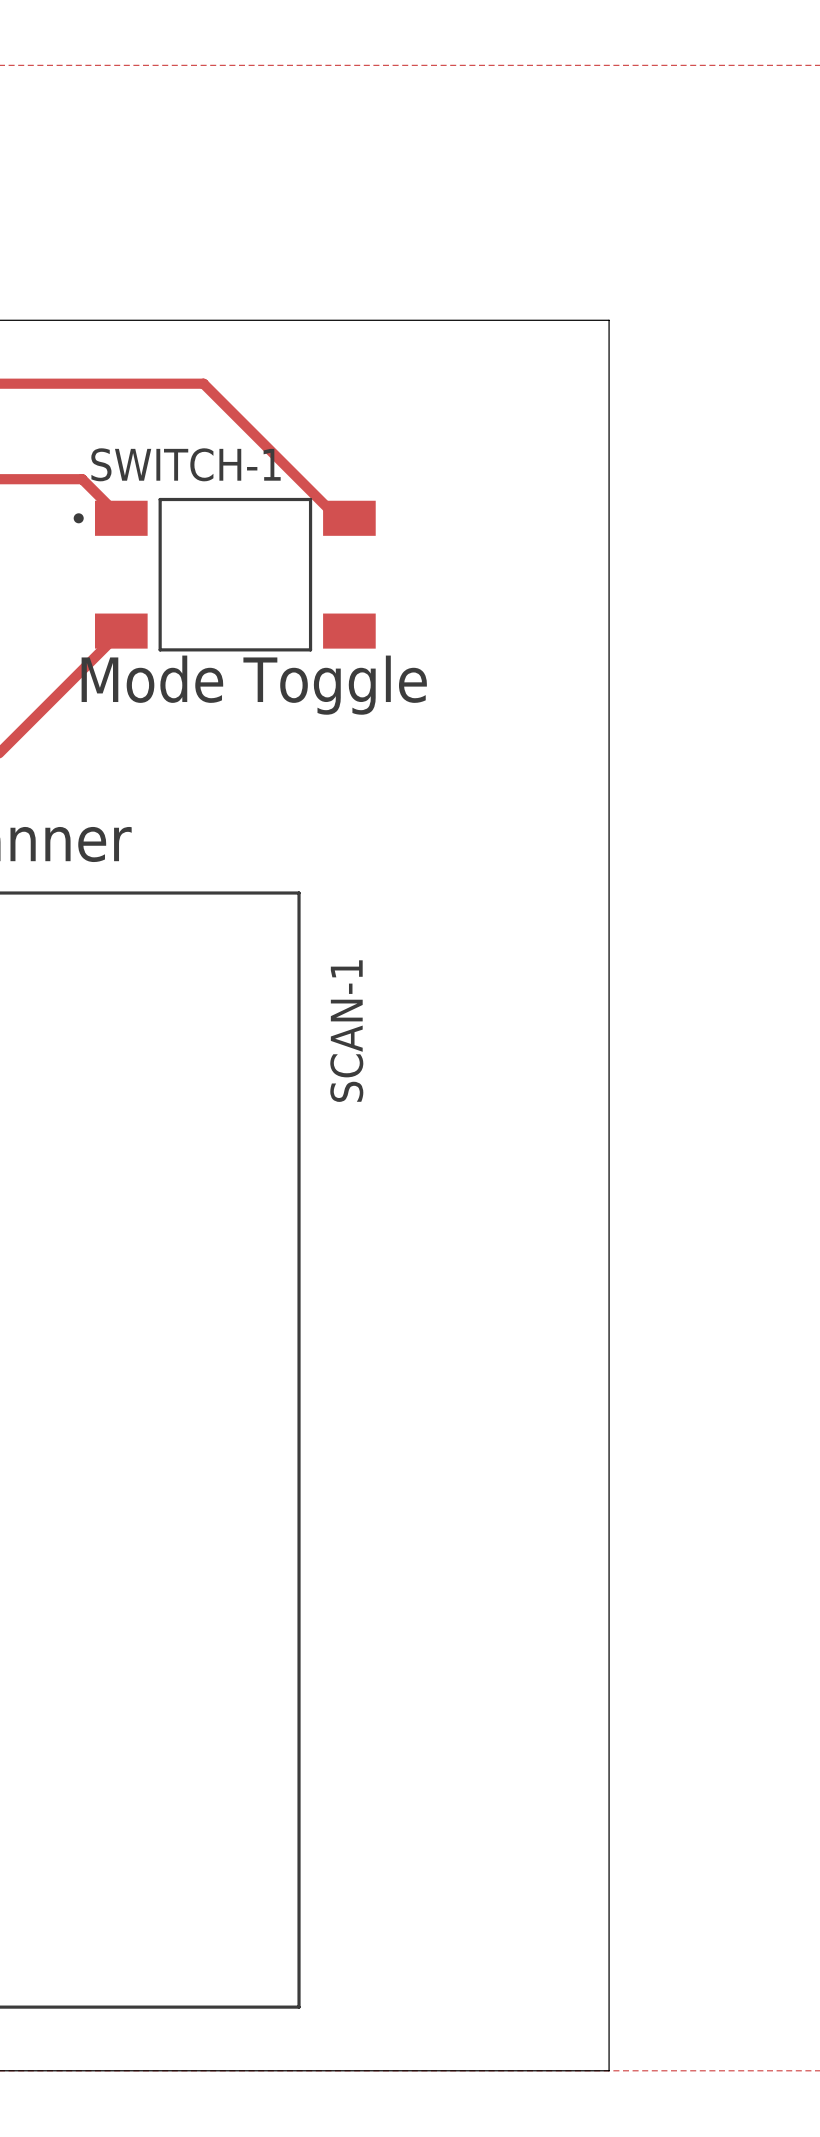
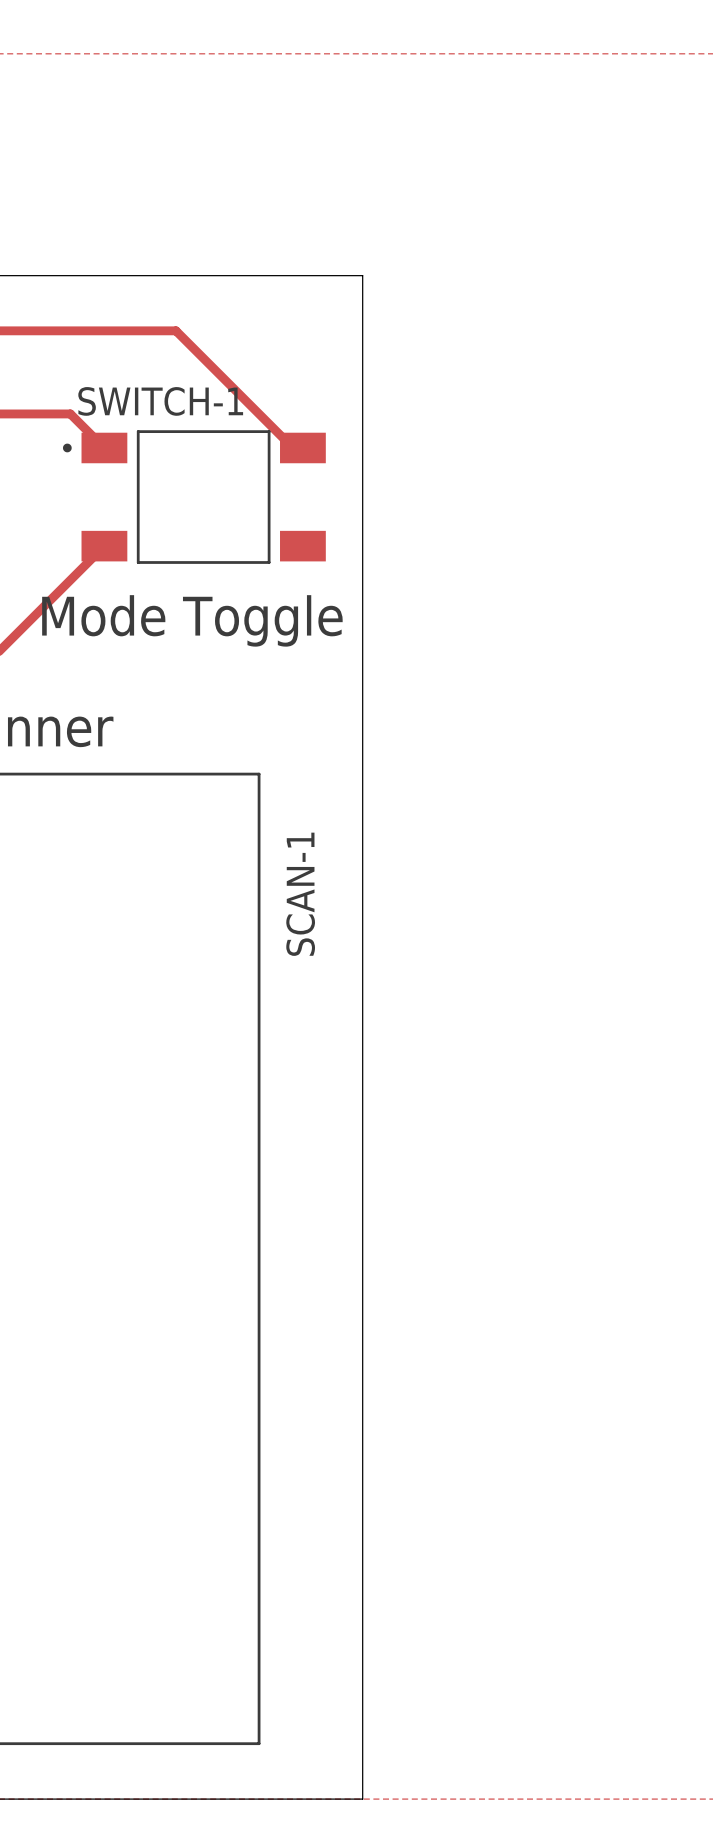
board edge: (418, 320) (609, 320) (609, 2070) (418, 2070) -> (362, 275) (362, 1799)
text position: Mode Toggle (254, 685) -> Mode Toggle (192, 620)

